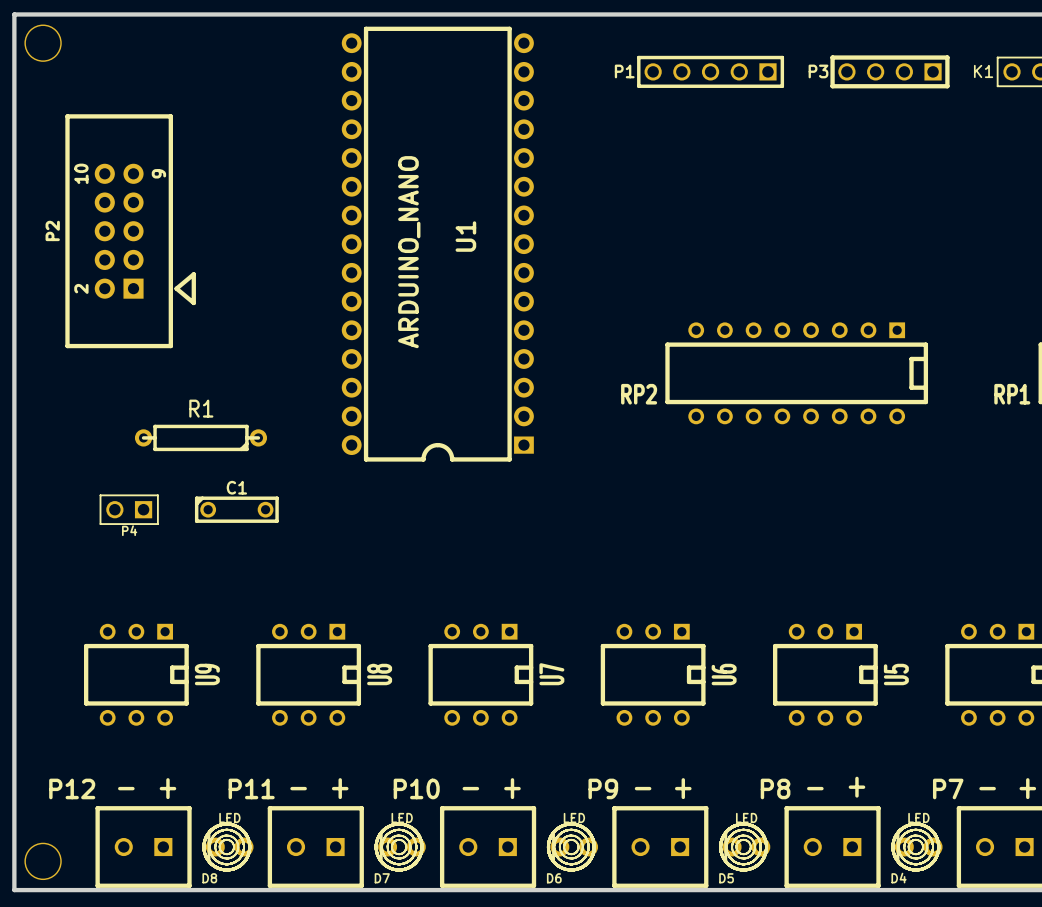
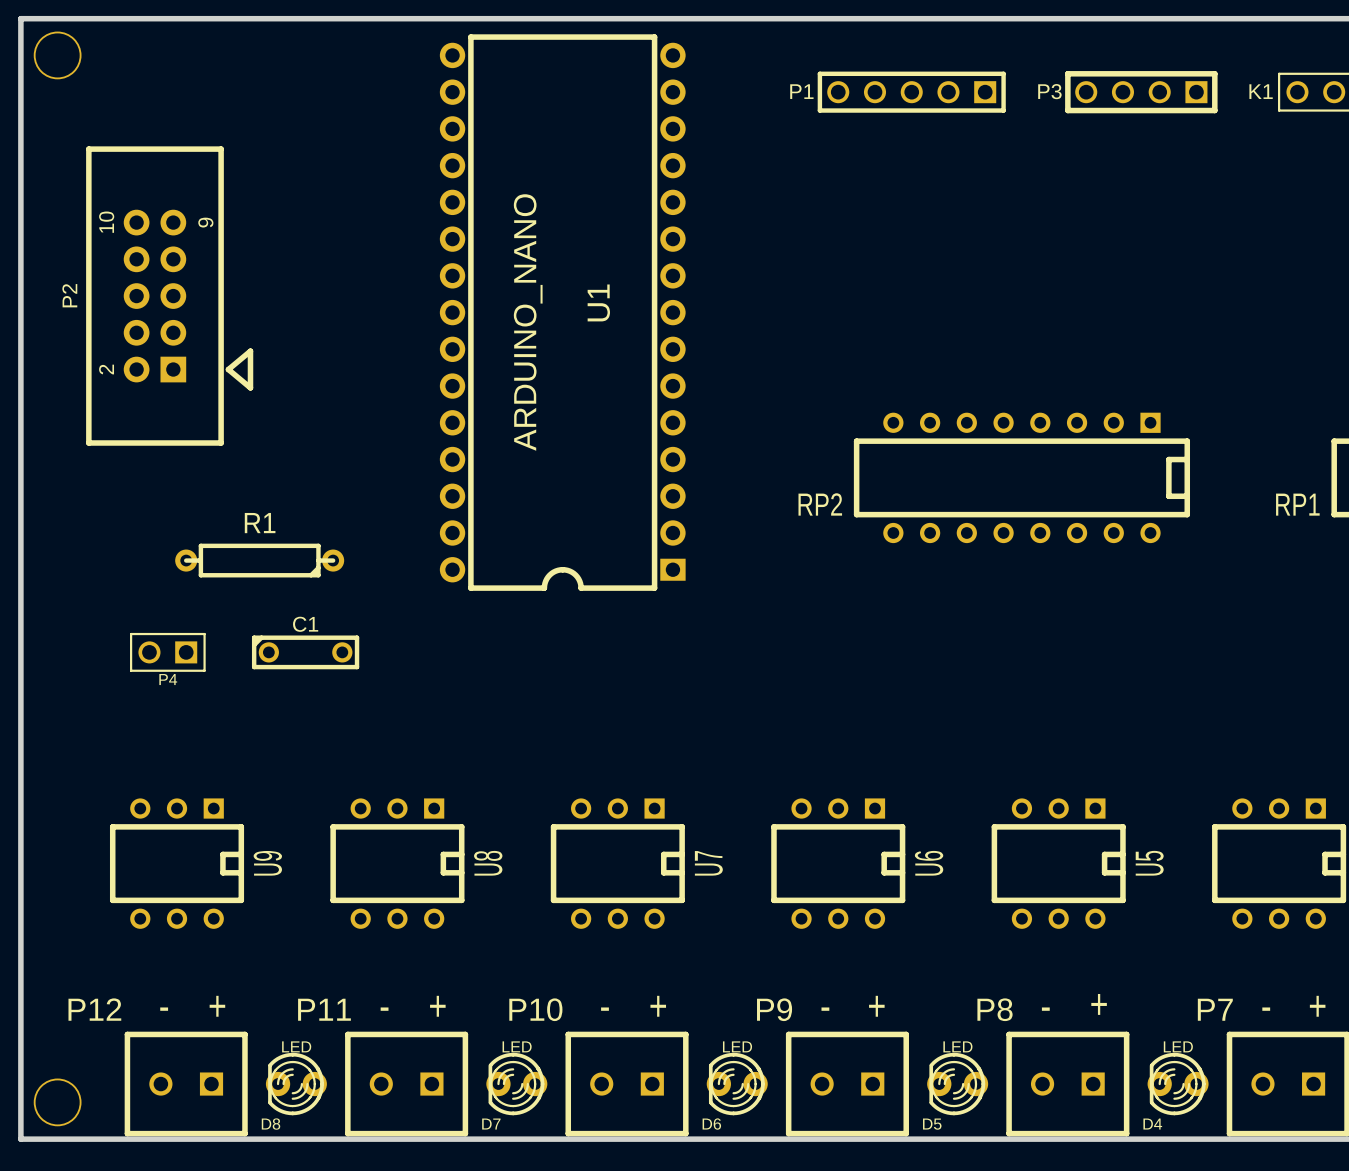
D8 footprint: [202, 822, 254, 872] -> [265, 1052, 327, 1116]
D7 footprint: [374, 822, 426, 872] -> [486, 1052, 548, 1116]
D6 footprint: [546, 822, 599, 872] -> [706, 1052, 768, 1116]
D5 footprint: [719, 822, 771, 872] -> [927, 1052, 989, 1116]
D4 footprint: [891, 822, 943, 872] -> [1147, 1052, 1209, 1116]

